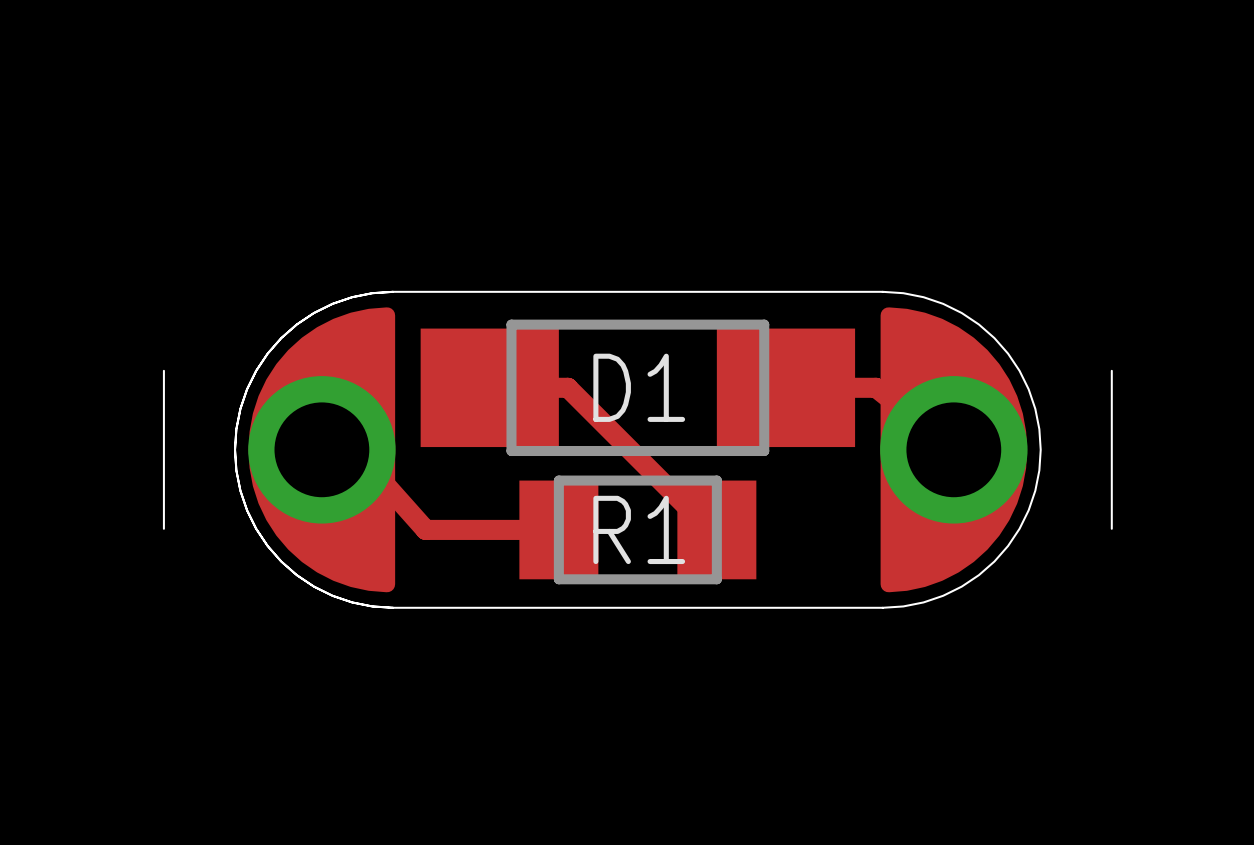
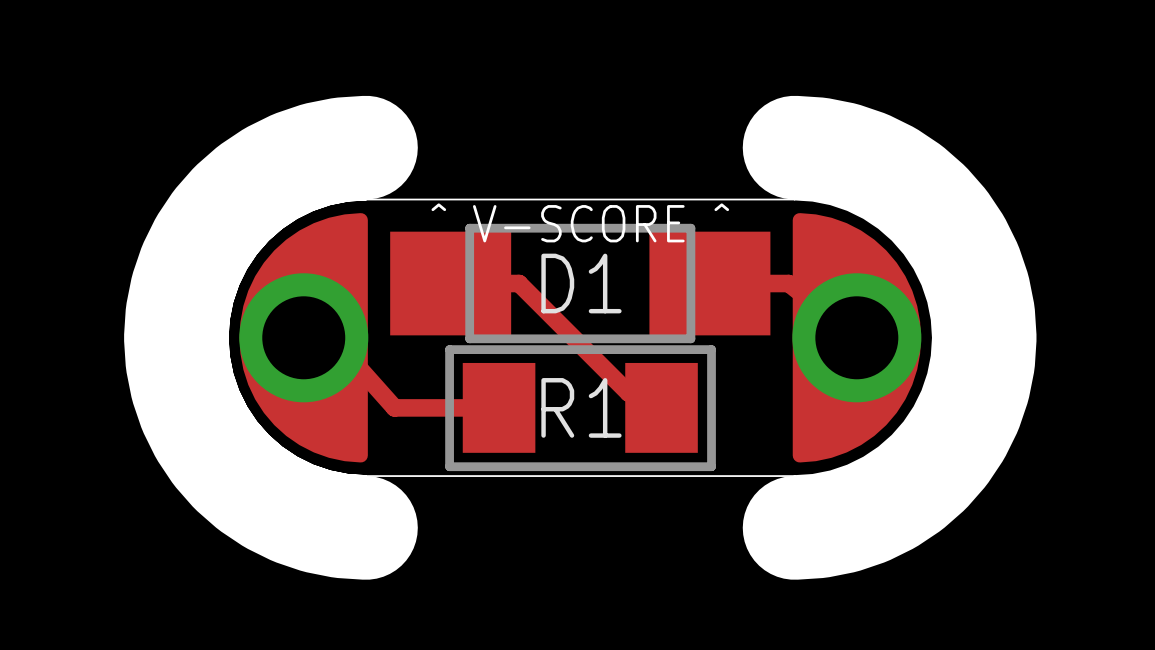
board edge: none -> (365, 147) (341, 149) (316, 154) (293, 162) (270, 173) (250, 186) (231, 203) (215, 222) (201, 242) (190, 265) (182, 288) (177, 312) (175, 337) (177, 362) (182, 387) (190, 410) (201, 432) (215, 453) (231, 472) (250, 488) (270, 502) (293, 513) (316, 521) (341, 526) (365, 527)
board edge: none -> (794, 147) (819, 149) (843, 154) (867, 162) (889, 173) (910, 186) (929, 203) (945, 222) (959, 242) (970, 265) (978, 288) (983, 312) (984, 337) (983, 362) (978, 387) (970, 410) (959, 432) (945, 453) (929, 472) (910, 488) (889, 502) (867, 513) (843, 521) (819, 526) (794, 527)
text: none -> ^ V-SCORE ^ (580, 222)
board edge: (163, 370) (163, 528) -> none
board edge: (1111, 370) (1111, 528) -> none
R1 footprint: [519, 475, 757, 585] -> [445, 345, 716, 472]

